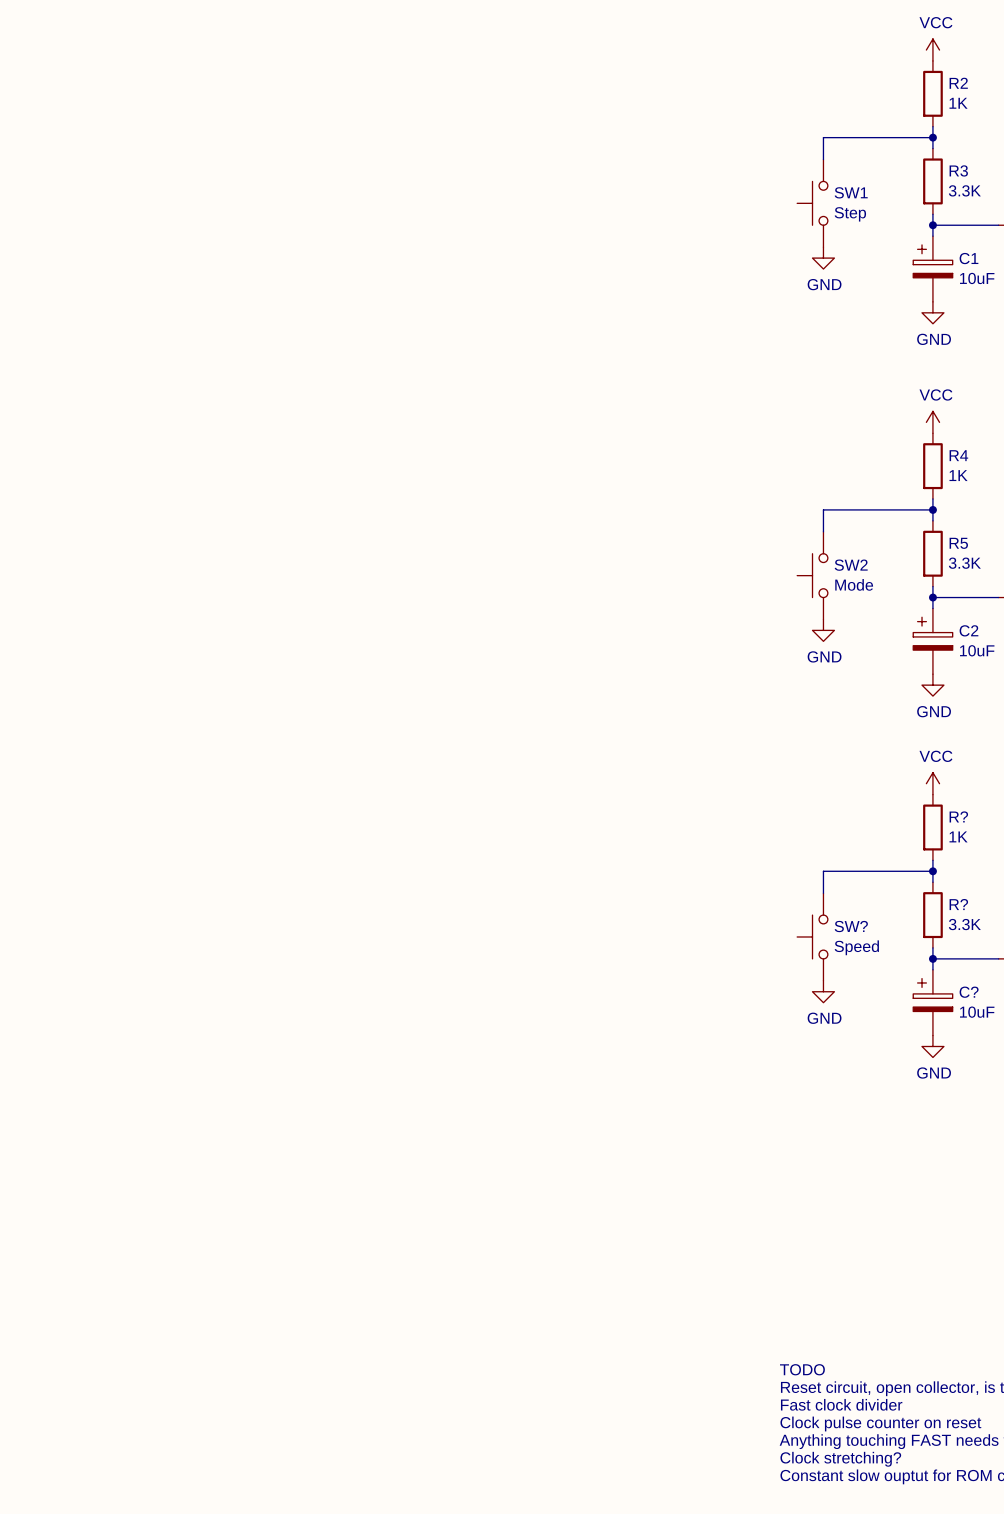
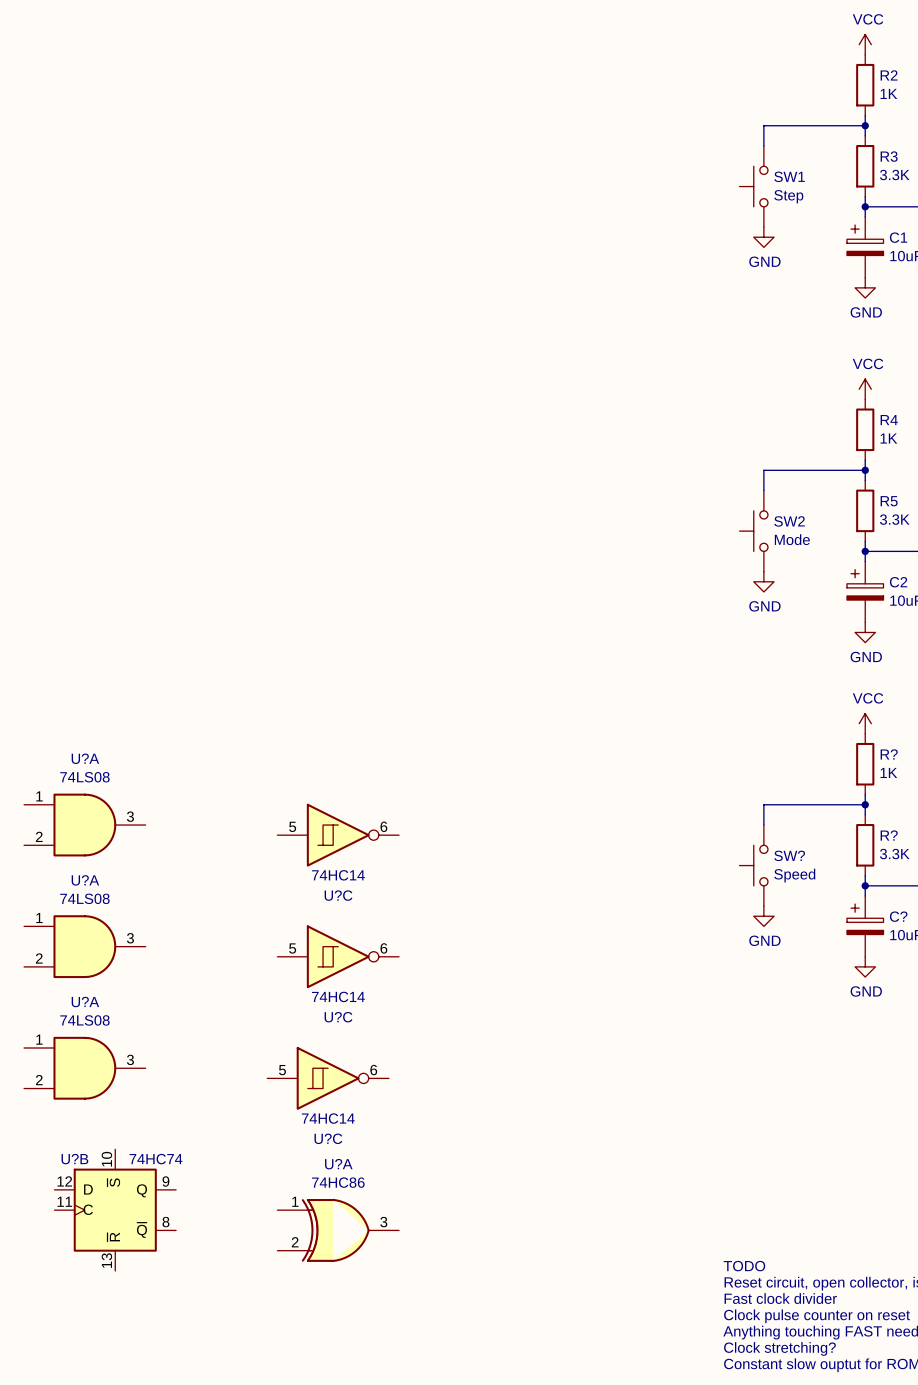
U?A: none -> 74LS08 (84, 825)
U?C: none -> 74HC14 (338, 835)
U?A: none -> 74LS08 (84, 946)
U?C: none -> 74HC14 (338, 956)
U?A: none -> 74LS08 (84, 1068)
U?C: none -> 74HC14 (328, 1078)
U?B: none -> 74HC74 (115, 1210)
U?A: none -> 74HC86 (338, 1230)

